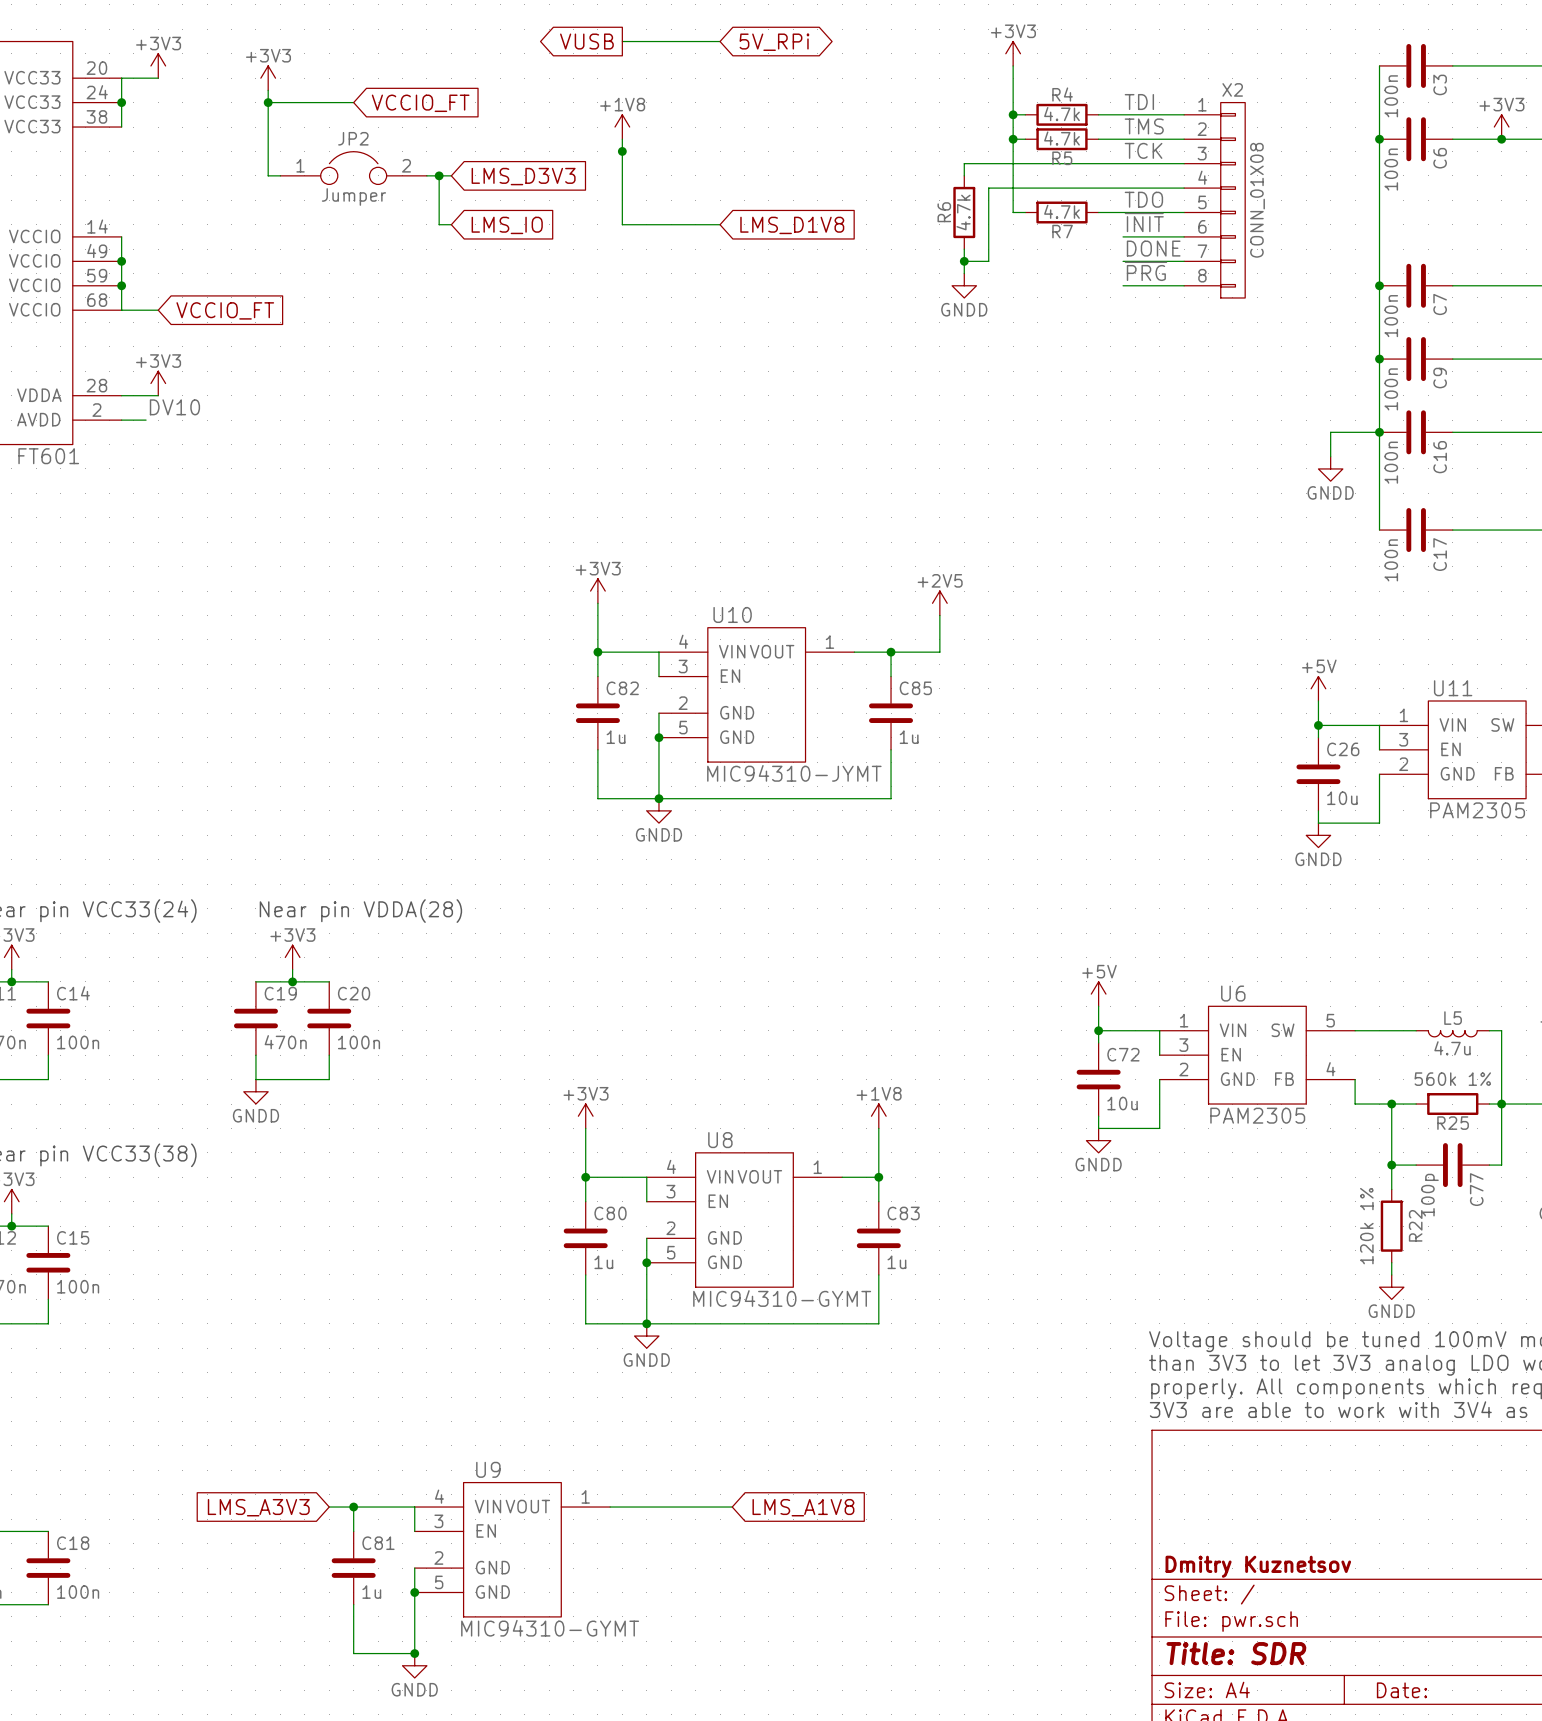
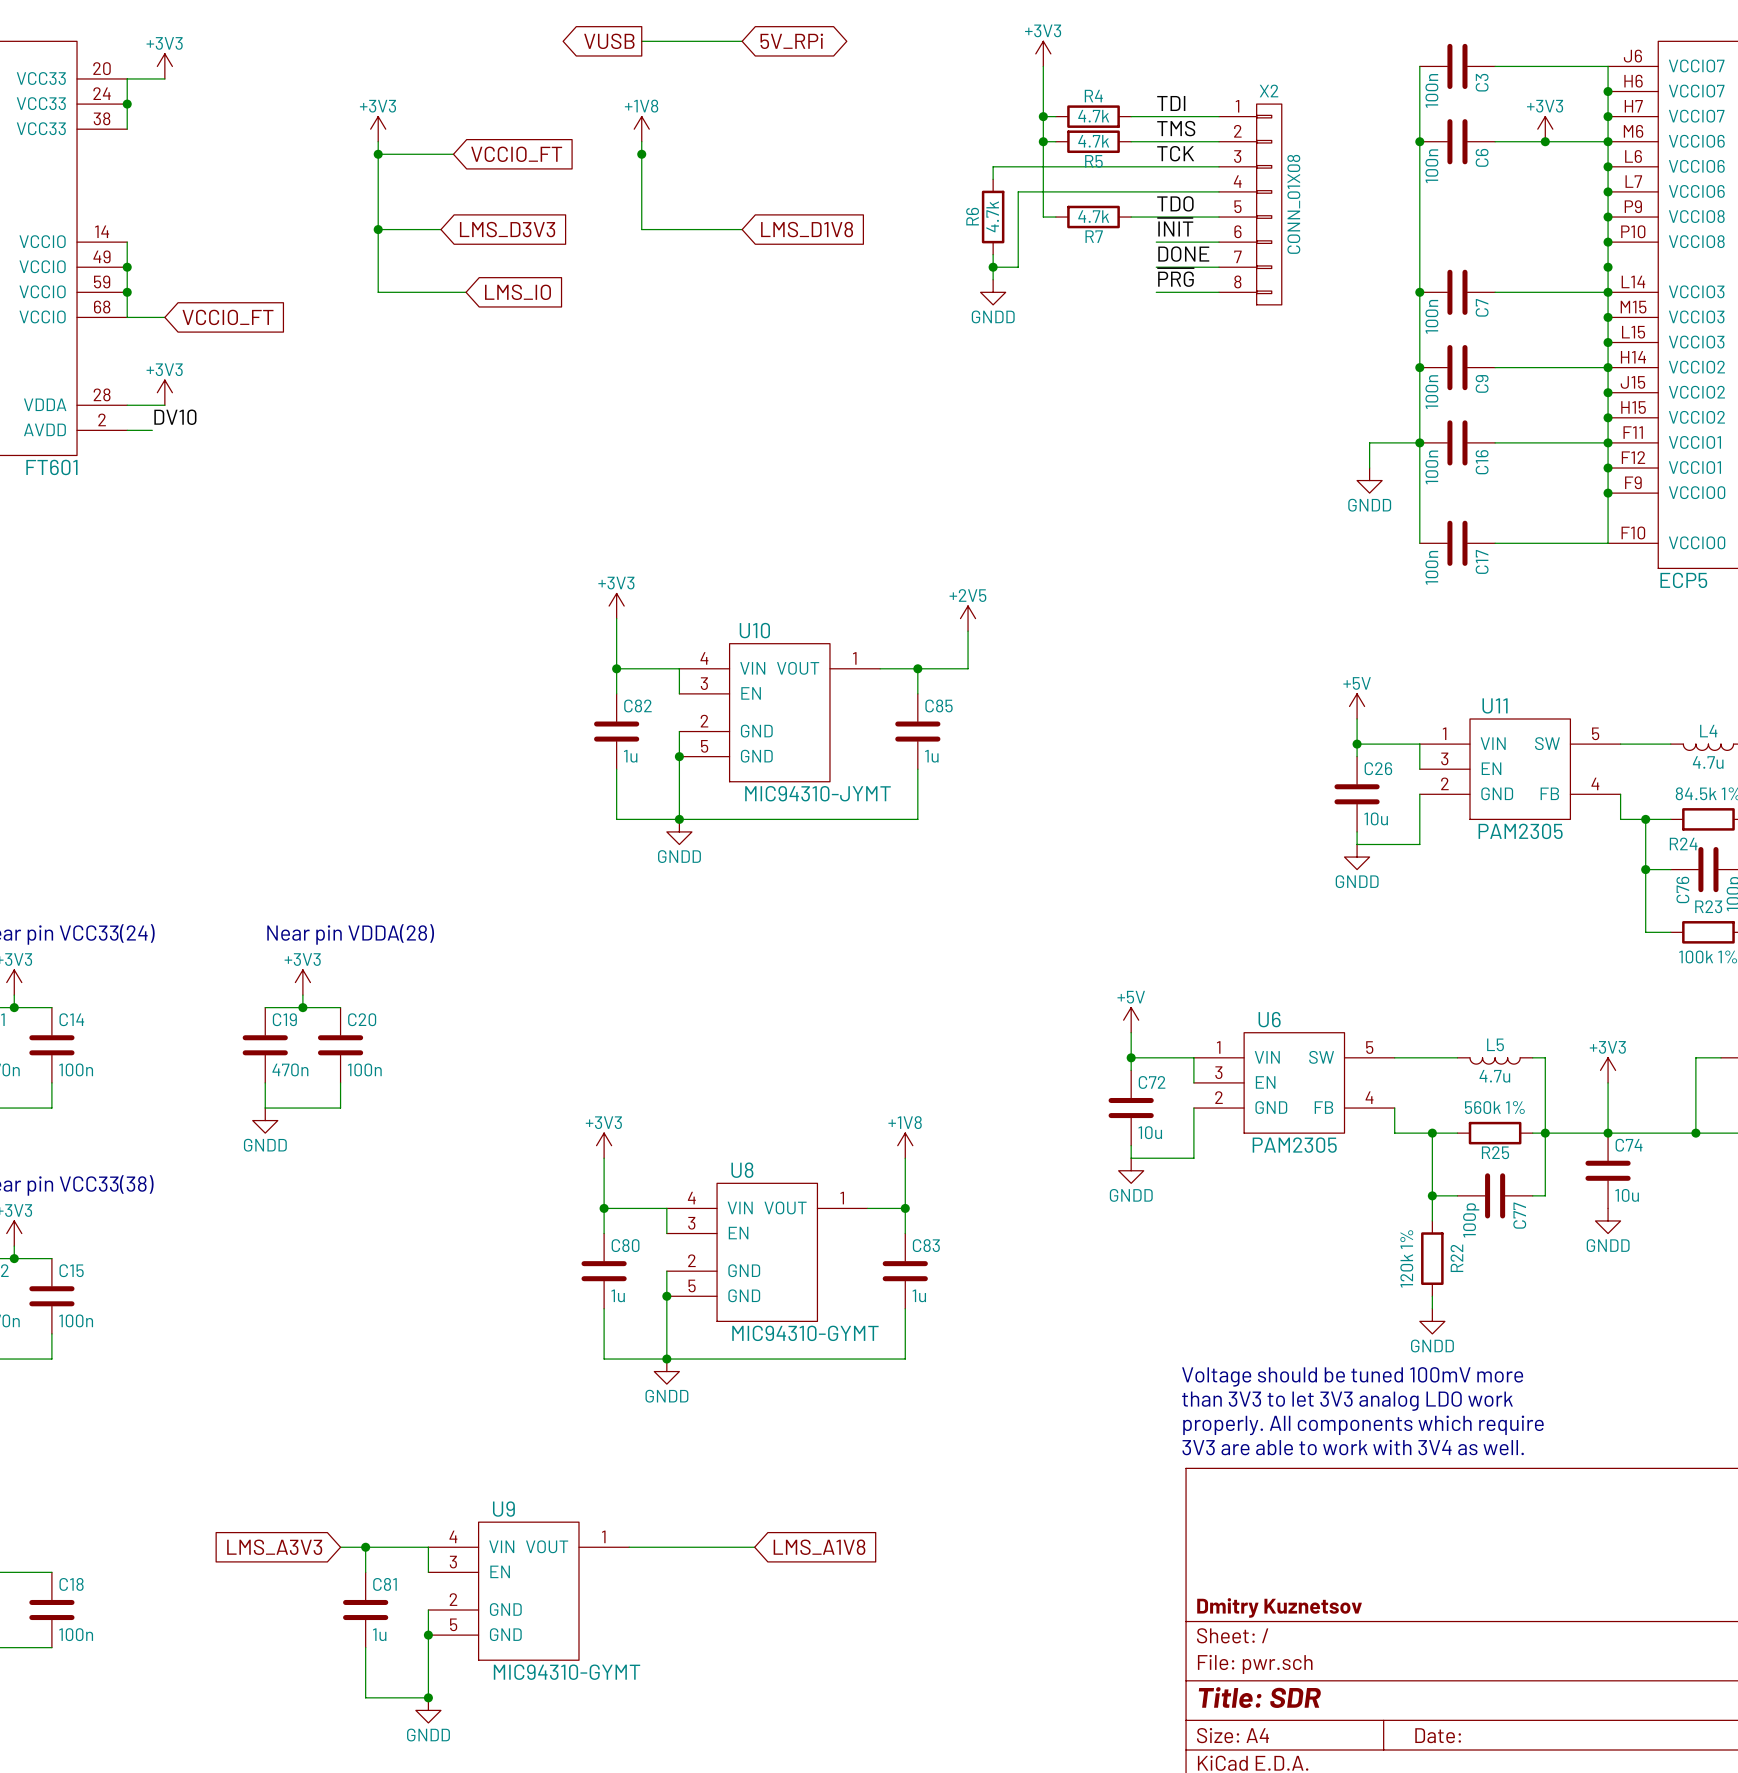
power symbol position: +3V3 (268, 78) -> +3V3 (378, 129)
wire: (268, 90) (268, 175) (280, 175) -> none
wire: (268, 102) (353, 102) -> none
junction: (268, 102) -> none
global label position: VCCIO_FT (420, 103) -> VCCIO_FT (516, 154)
wire: none -> (378, 141) (378, 292) (466, 292)
wire: none -> (378, 154) (453, 154)
junction: none -> (378, 154)
JP2: Jumper (353, 168) -> none
wire: (426, 175) (451, 175) -> none
wire: (439, 175) (439, 224) (451, 224) -> none
junction: (439, 175) -> none
global label position: LMS_D3V3 (523, 176) -> LMS_D3V3 (507, 229)
wire: none -> (378, 229) (440, 229)
junction: none -> (378, 229)
global label position: LMS_IO (507, 225) -> LMS_IO (517, 292)

